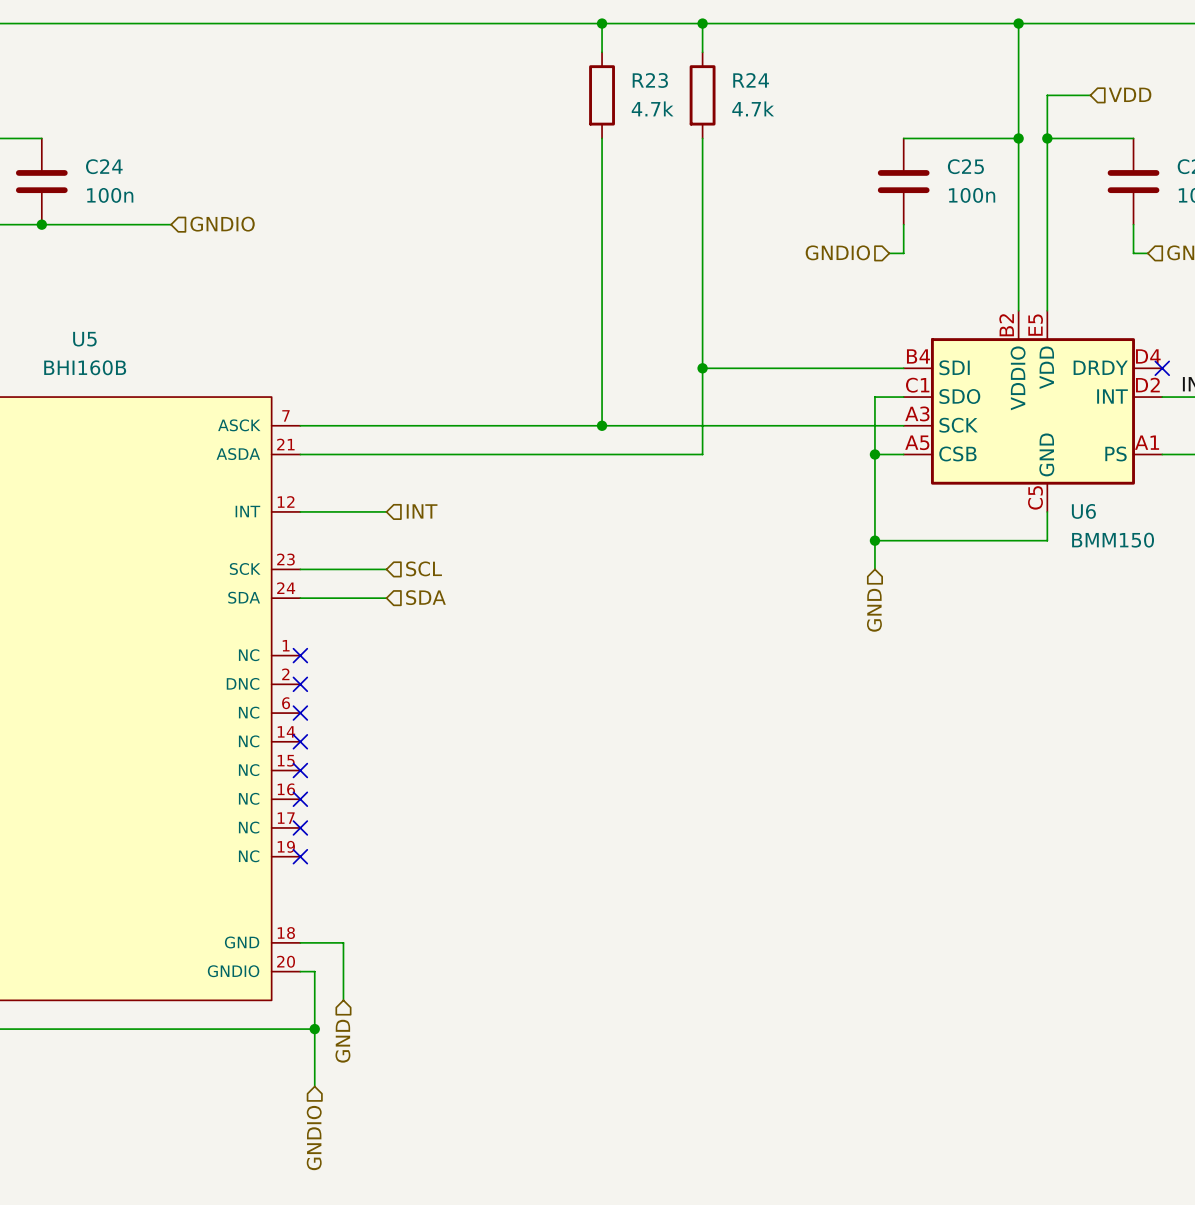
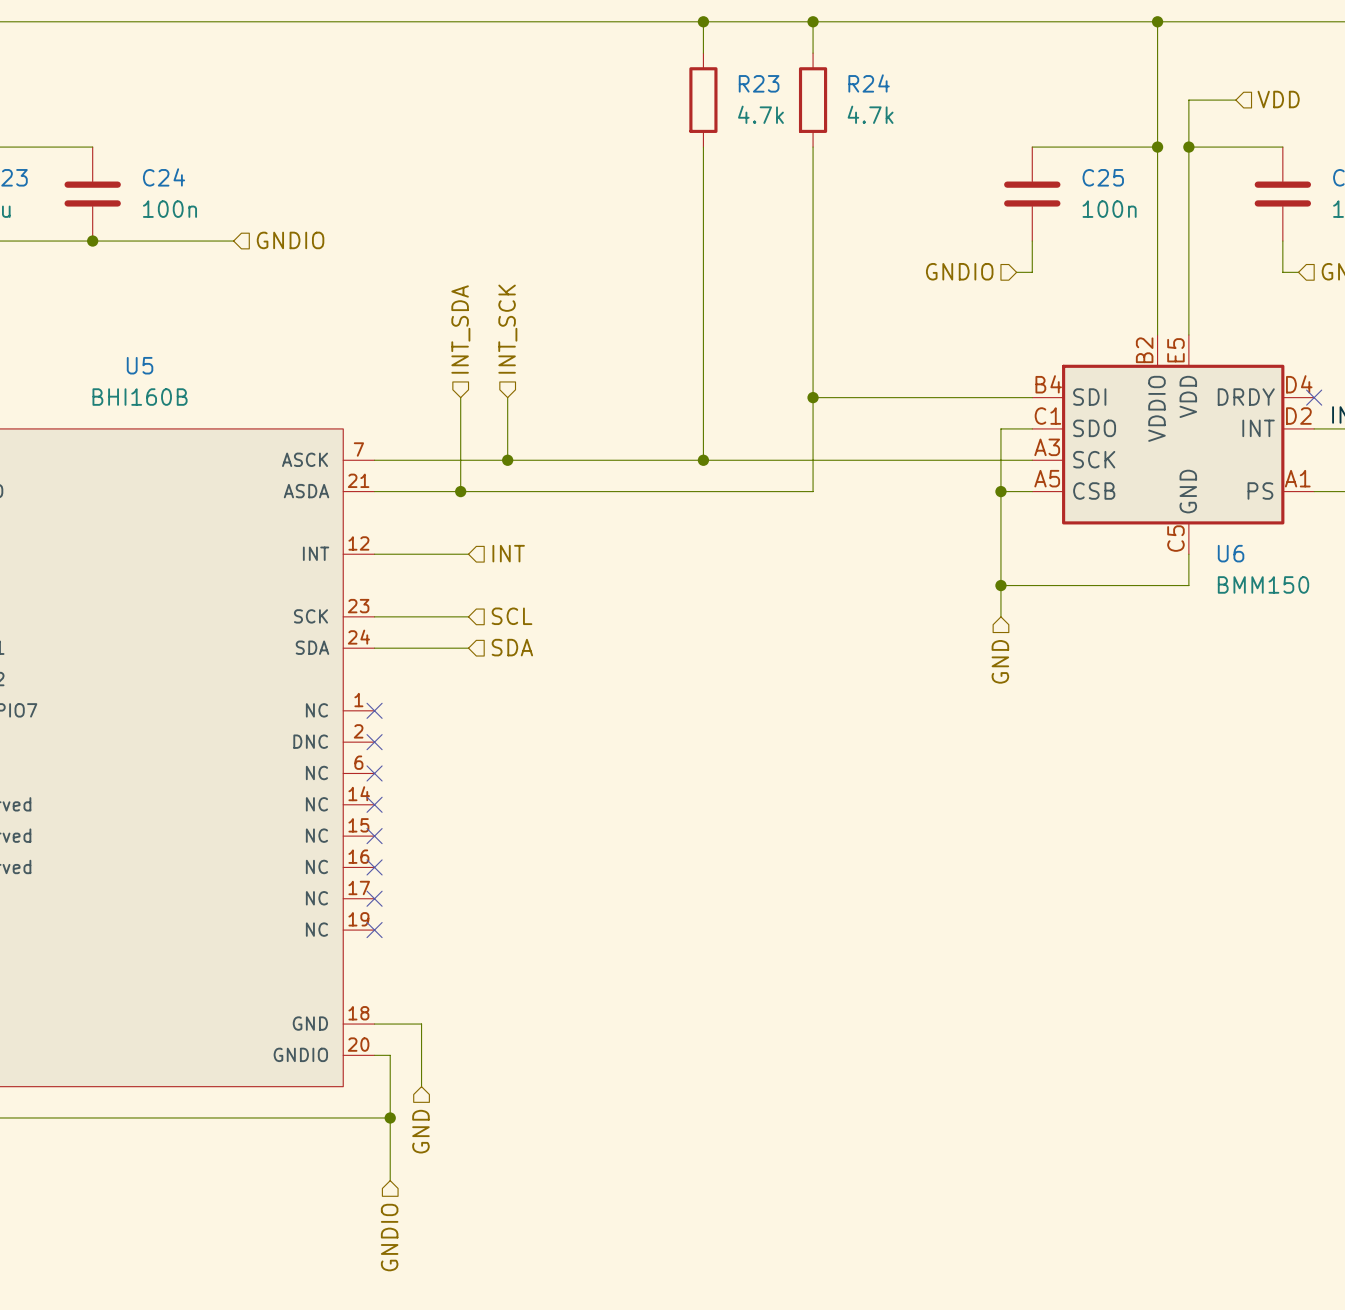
hierarchical label: none -> INT_SDA (460, 329)
hierarchical label: none -> INT_SCK (507, 329)
wire: none -> (460, 397) (460, 491)
wire: none -> (507, 397) (507, 460)
junction: none -> (507, 460)
junction: none -> (460, 491)

